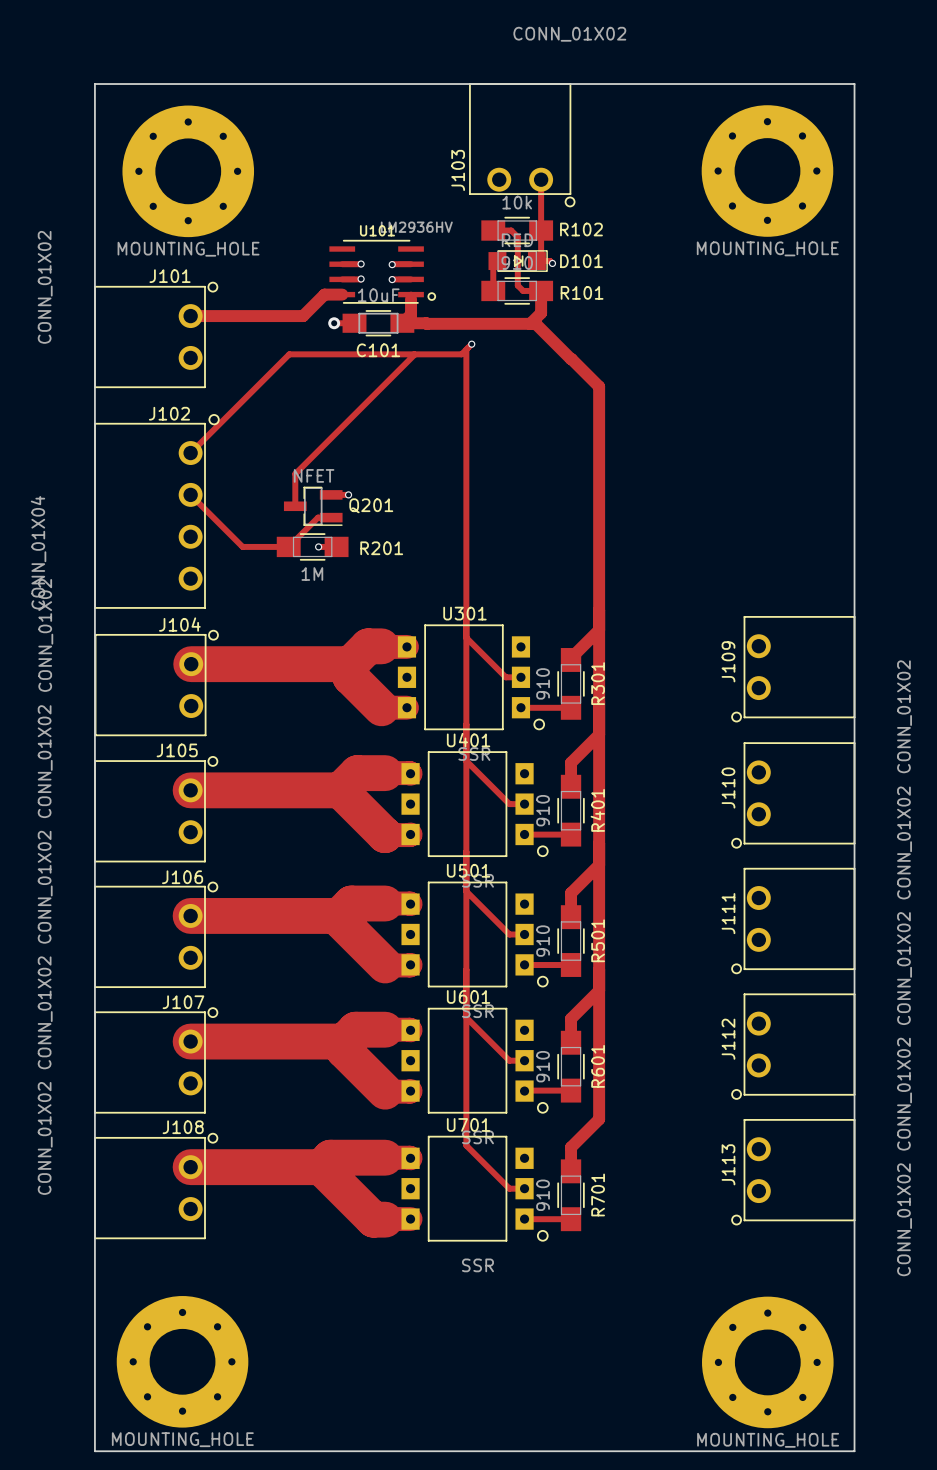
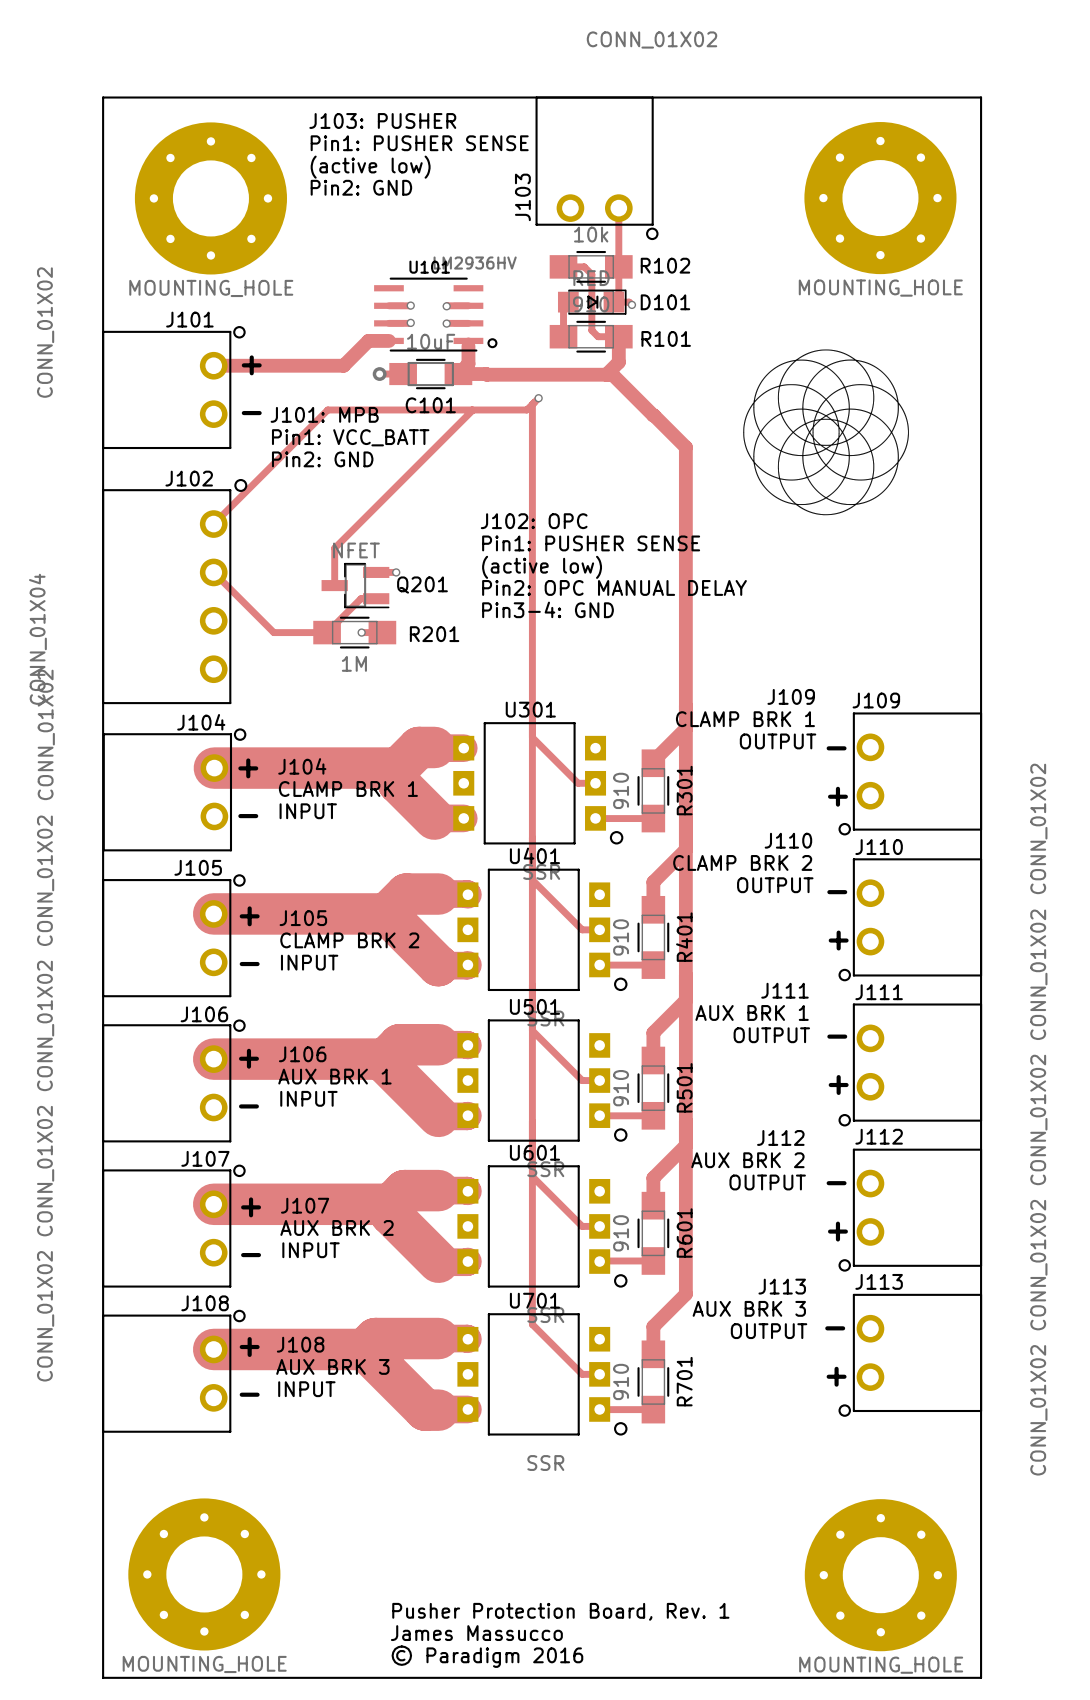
text: none -> J103: PUSHER (382, 120)
text: none -> Pin1: PUSHER SENSE (419, 143)
text: none -> (active low) (370, 167)
text: none -> Pin2: GND (361, 187)
drawing: none -> [743, 349, 909, 516]
text: none -> + (251, 365)
text: none -> - (251, 413)
text: none -> J101: MPB (324, 414)
text: none -> Pin1: VCC_BATT (350, 437)
text: none -> Pin2: GND (322, 459)
text: none -> J102: OPC (534, 521)
text: none -> Pin1: PUSHER SENSE (591, 543)
text: none -> (active low) (542, 567)
text: none -> Pin2: OPC MANUAL DELAY (614, 587)
text: none -> Pin3-4: GND (547, 609)
text: none -> J109 (791, 696)
text: none -> CLAMP BRK 1 (745, 719)
text: none -> OUTPUT (778, 741)
text: none -> - (836, 748)
J109 name rotation: 0° (728, 661) -> 90° clockwise (876, 700)
J109 name position: J109 (728, 661) -> J109 (876, 700)
text: none -> J104 (302, 766)
text: none -> + (248, 768)
text: none -> CLAMP BRK 1 (348, 788)
text: none -> + (837, 796)
text: none -> INPUT (308, 811)
text: none -> - (248, 816)
text: none -> J110 (788, 840)
text: none -> CLAMP BRK 2 (742, 862)
text: none -> OUTPUT (775, 885)
text: none -> - (837, 892)
J110 name rotation: 0° (728, 788) -> 90° clockwise (879, 847)
J110 name position: J110 (728, 788) -> J110 (879, 847)
text: none -> + (249, 916)
text: none -> J105 (303, 918)
text: none -> CLAMP BRK 2 (349, 940)
text: none -> + (838, 940)
text: none -> INPUT (309, 962)
text: none -> - (249, 964)
text: none -> J111 (784, 990)
text: none -> AUX BRK 1 (752, 1012)
text: none -> OUTPUT (771, 1035)
text: none -> - (837, 1036)
text: none -> J106 (302, 1054)
J111 name rotation: 0° (728, 913) -> 90° clockwise (879, 992)
J111 name position: J111 (728, 913) -> J111 (879, 992)
text: none -> + (248, 1058)
text: none -> AUX BRK 1 (334, 1076)
text: none -> + (838, 1085)
text: none -> INPUT (308, 1098)
text: none -> - (248, 1106)
text: none -> J112 (780, 1137)
text: none -> AUX BRK 2 (747, 1160)
text: none -> OUTPUT (767, 1182)
text: none -> - (836, 1183)
J112 name rotation: 0° (728, 1039) -> 90° clockwise (879, 1136)
J112 name position: J112 (728, 1039) -> J112 (879, 1136)
text: none -> J107 (305, 1205)
text: none -> + (251, 1207)
text: none -> AUX BRK 2 (337, 1227)
text: none -> + (837, 1231)
text: none -> INPUT (311, 1250)
text: none -> - (251, 1255)
text: none -> J113 (782, 1286)
text: none -> AUX BRK 3 (749, 1308)
text: none -> - (835, 1328)
text: none -> OUTPUT (769, 1331)
text: none -> J108 (300, 1344)
J113 name rotation: 0° (728, 1164) -> 90° clockwise (879, 1281)
J113 name position: J113 (728, 1164) -> J113 (879, 1281)
text: none -> + (249, 1347)
text: none -> AUX BRK 3 (332, 1366)
text: none -> + (836, 1376)
text: none -> INPUT (306, 1389)
text: none -> - (249, 1394)
text: none -> Pusher Protection Board, Rev. 1 (560, 1611)
text: none -> James Massucco (476, 1633)
text: none -> © Paradigm 2016 (487, 1656)

